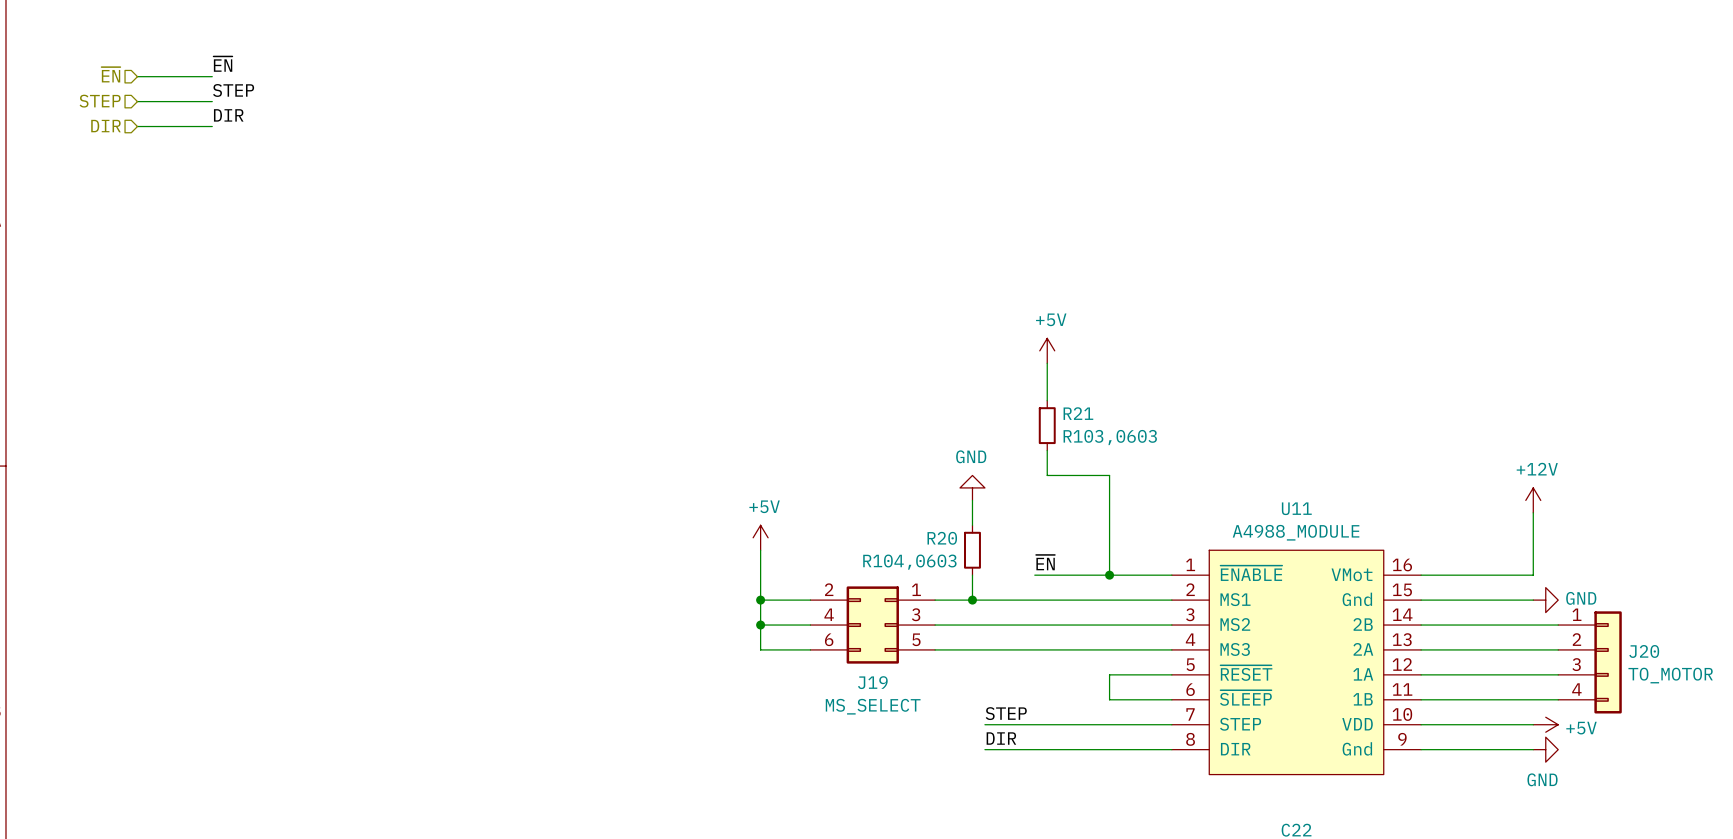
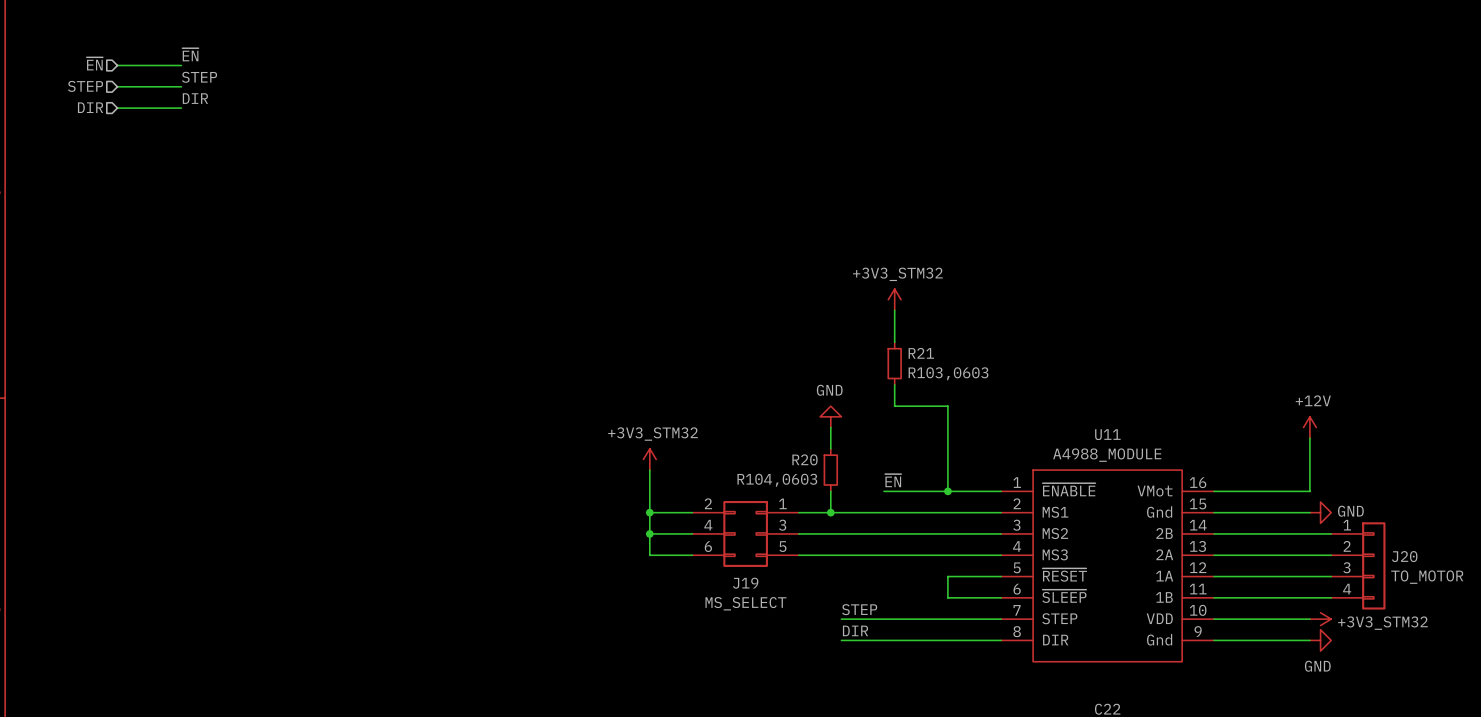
power symbol: +5V (1047, 350) -> +3V3_STM32 (894, 299)
power symbol: +5V (760, 537) -> +3V3_STM32 (649, 459)
power symbol: +5V (1545, 724) -> +3V3_STM32 (1320, 619)

